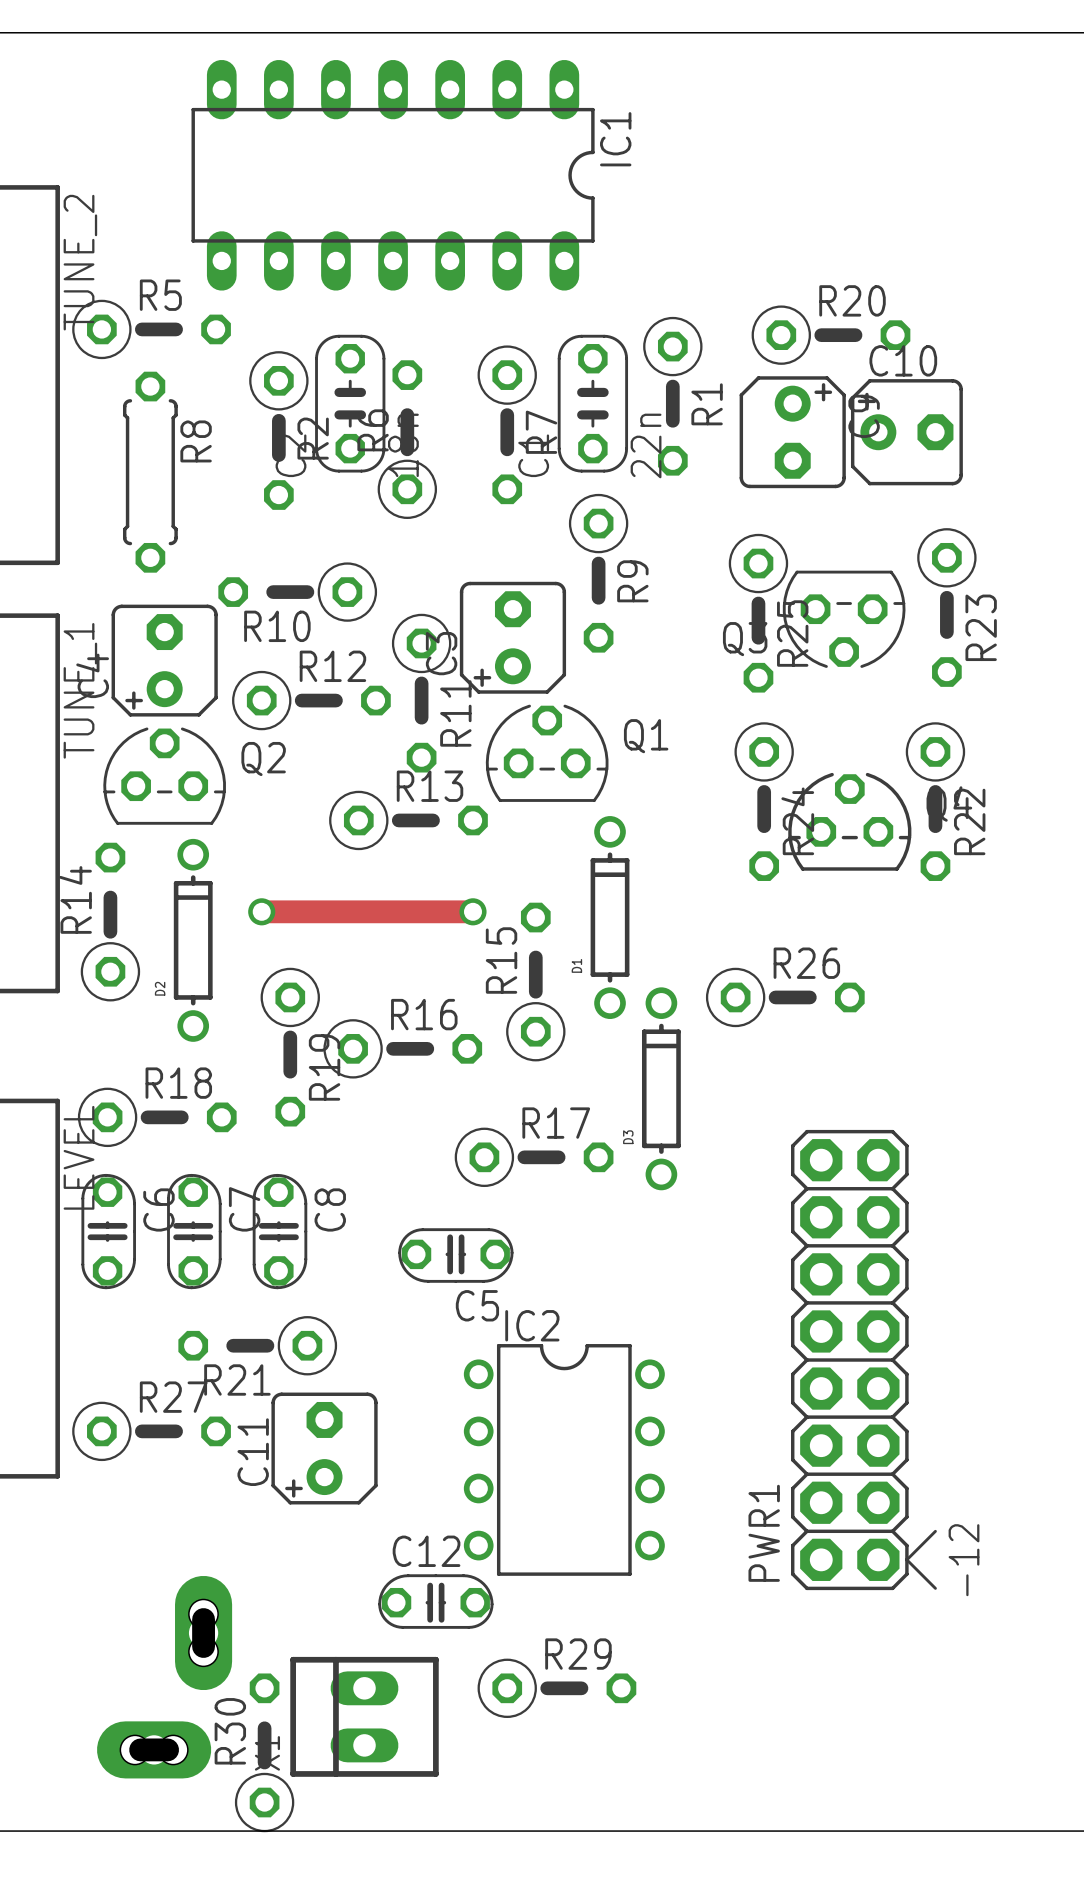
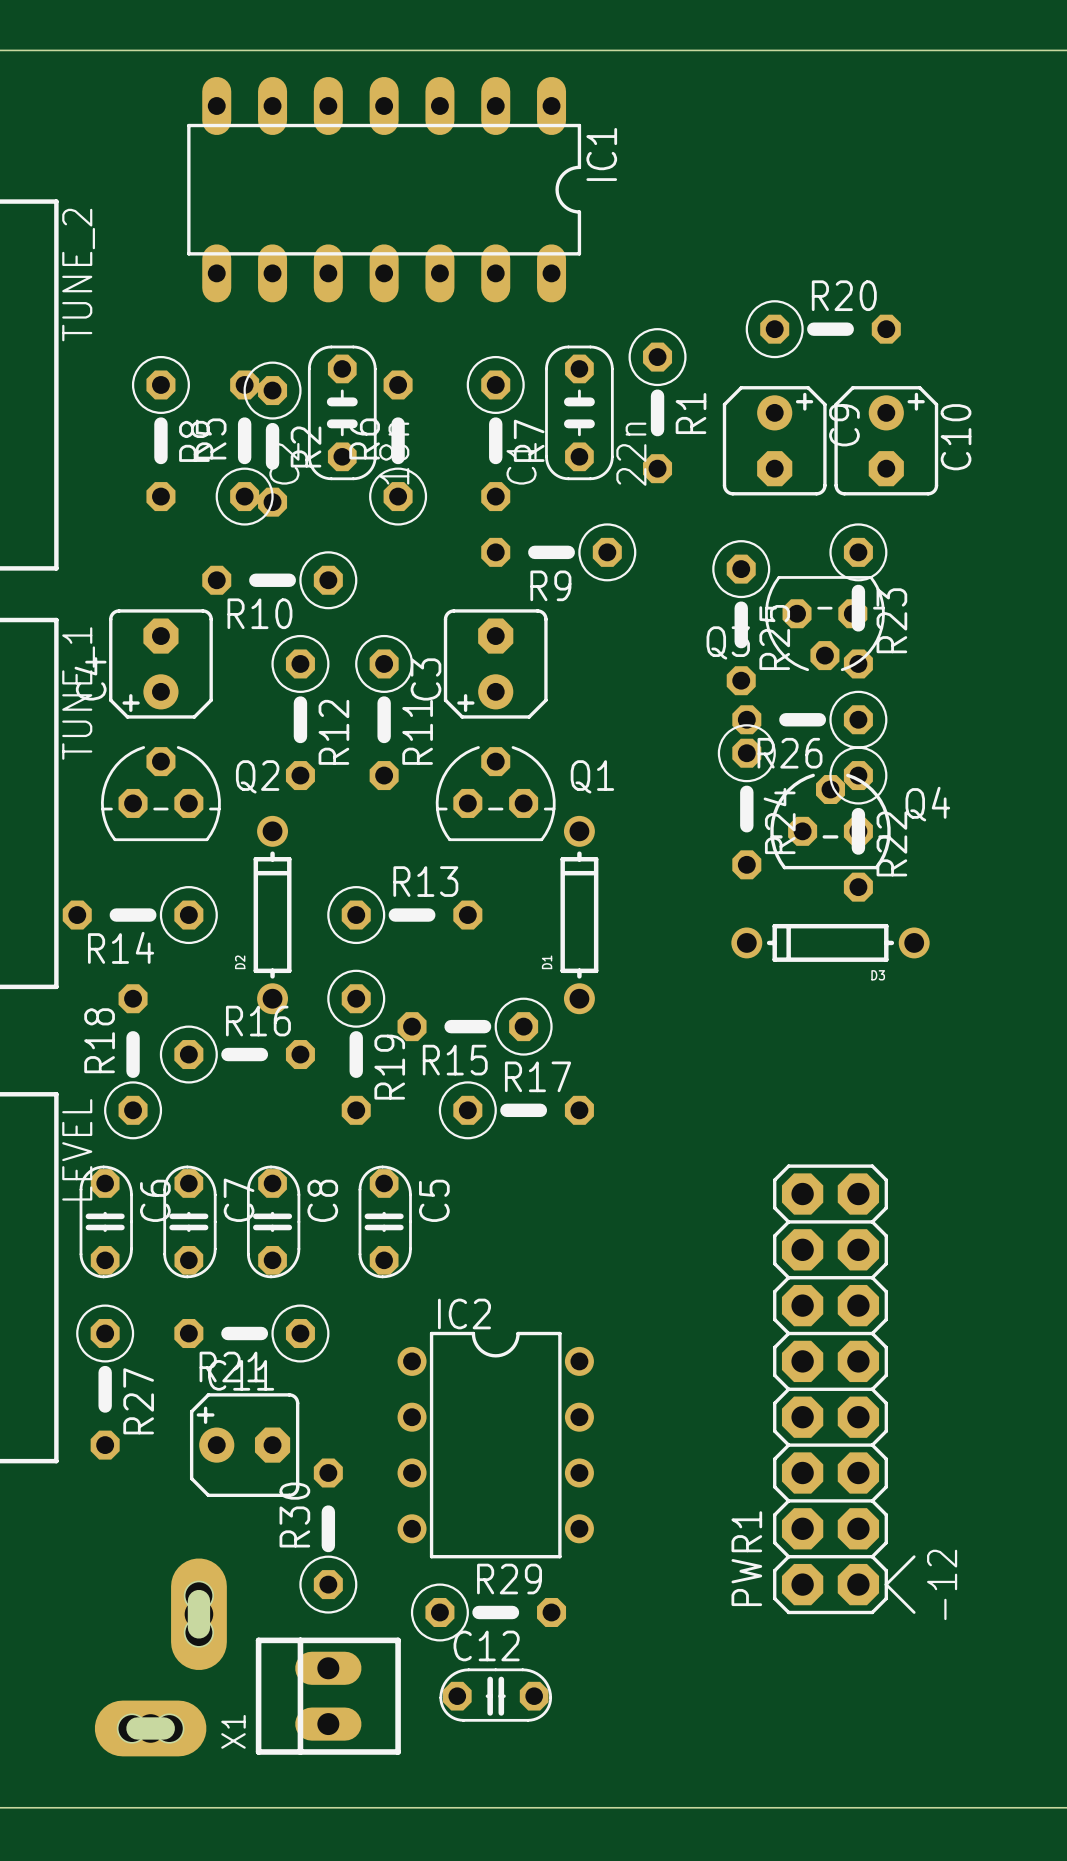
R5 rotation: 0° (151, 329) -> 90° counterclockwise (244, 448)
R5 position: (151, 329) -> (244, 448)
R20 position: (830, 335) -> (823, 329)
R8 footprint: [122, 371, 178, 573] -> [131, 355, 190, 512]
C10 rotation: 0° (906, 432) -> 90° clockwise (886, 440)
R9 rotation: 0° (598, 573) -> 90° clockwise (558, 552)
R10 position: (297, 592) -> (279, 580)
R23 position: (946, 607) -> (858, 600)
C3 position: (512, 637) -> (495, 663)
R11 position: (421, 693) -> (384, 712)
R12 rotation: 0° (311, 700) -> 90° clockwise (300, 712)
Q1 position: (547, 753) -> (495, 793)
Q2 position: (164, 776) -> (160, 793)
R22 position: (935, 801) -> (858, 824)
R13 position: (408, 820) -> (404, 915)
track: (261, 911) (472, 911) -> none
via: (261, 911) -> none
via: (472, 911) -> none
D1 position: (610, 917) -> (579, 915)
R14 rotation: 0° (110, 922) -> 90° counterclockwise (140, 915)
D2 position: (193, 940) -> (272, 915)
R15 rotation: 0° (535, 982) -> 90° counterclockwise (475, 1026)
R26 rotation: 0° (785, 997) -> 180° (809, 719)
R26 position: (785, 997) -> (809, 719)
R19 position: (290, 1047) -> (356, 1047)
R16 position: (402, 1048) -> (237, 1054)
D3 rotation: 0° (661, 1088) -> 90° counterclockwise (830, 942)
D3 position: (661, 1088) -> (830, 942)
R18 rotation: 0° (157, 1117) -> 90° counterclockwise (133, 1061)
R17 position: (534, 1157) -> (516, 1110)
C5 rotation: 0° (455, 1255) -> 90° counterclockwise (385, 1221)
PWR1 position: (863, 1360) -> (844, 1389)
R27 rotation: 0° (151, 1431) -> 90° clockwise (105, 1382)
C11 rotation: 0° (324, 1448) -> 90° clockwise (244, 1445)
C11 position: (324, 1448) -> (244, 1445)
IC2 position: (564, 1459) -> (495, 1445)
C12 position: (435, 1601) -> (495, 1695)
R29 position: (556, 1688) -> (488, 1612)
X1 position: (364, 1716) -> (328, 1696)
R30 position: (264, 1752) -> (328, 1536)

